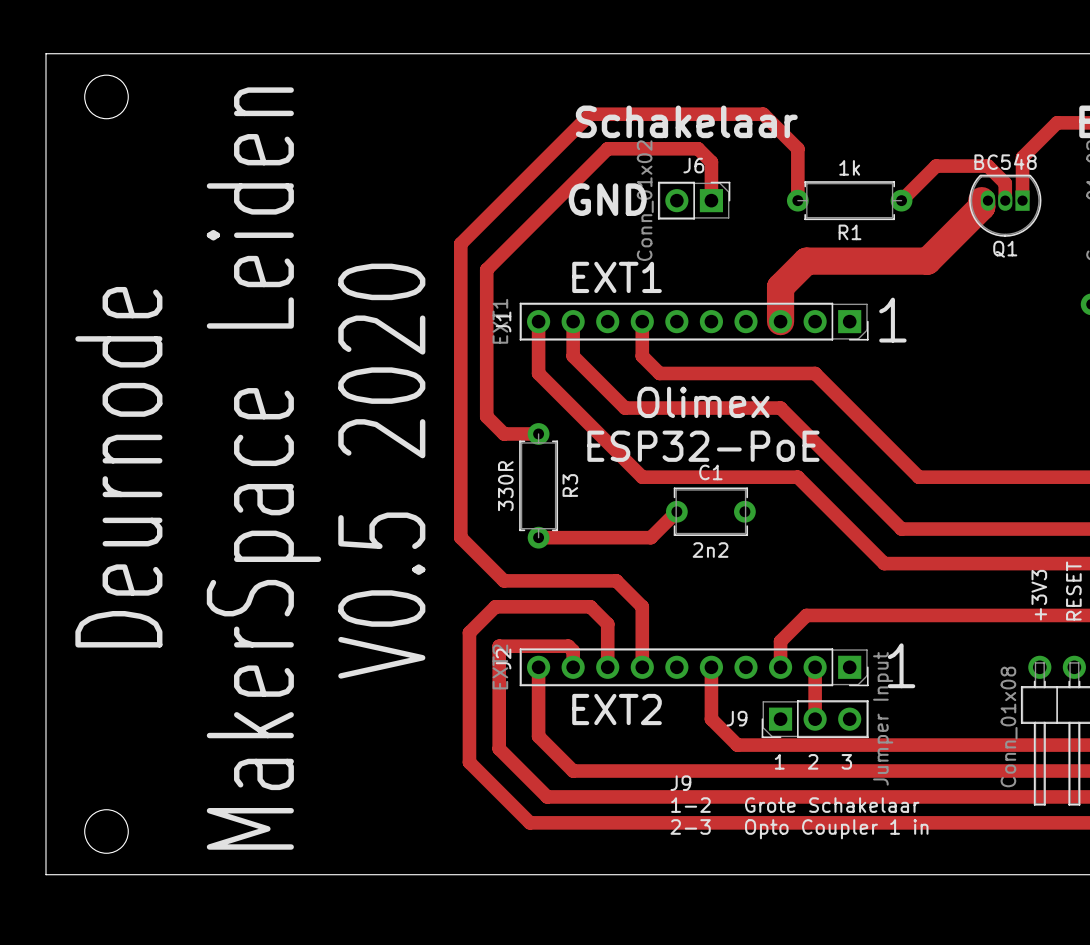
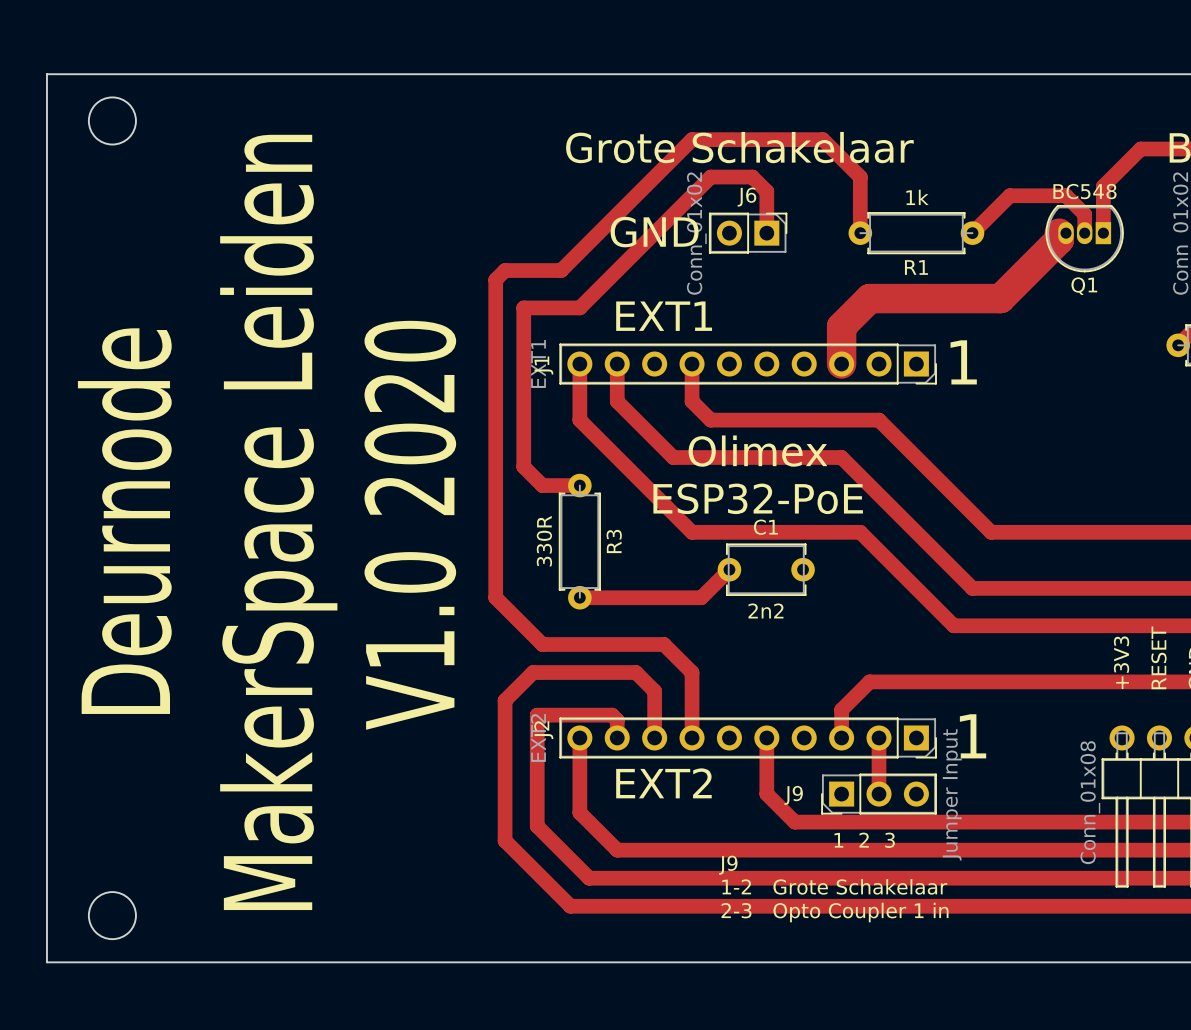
track: (642, 114) (590, 114) (469, 235) -> none
text: Schakelaar (686, 121) -> Grote Schakelaar (739, 147)
track: (607, 148) (659, 148) -> (654, 177) (692, 139)
track: none -> (710, 177) (579, 307) (523, 307)
track: (521, 235) (486, 269) -> (561, 270) (505, 270)
text: V0.5 2020 (381, 471) -> V1.0 2020 (410, 525)

